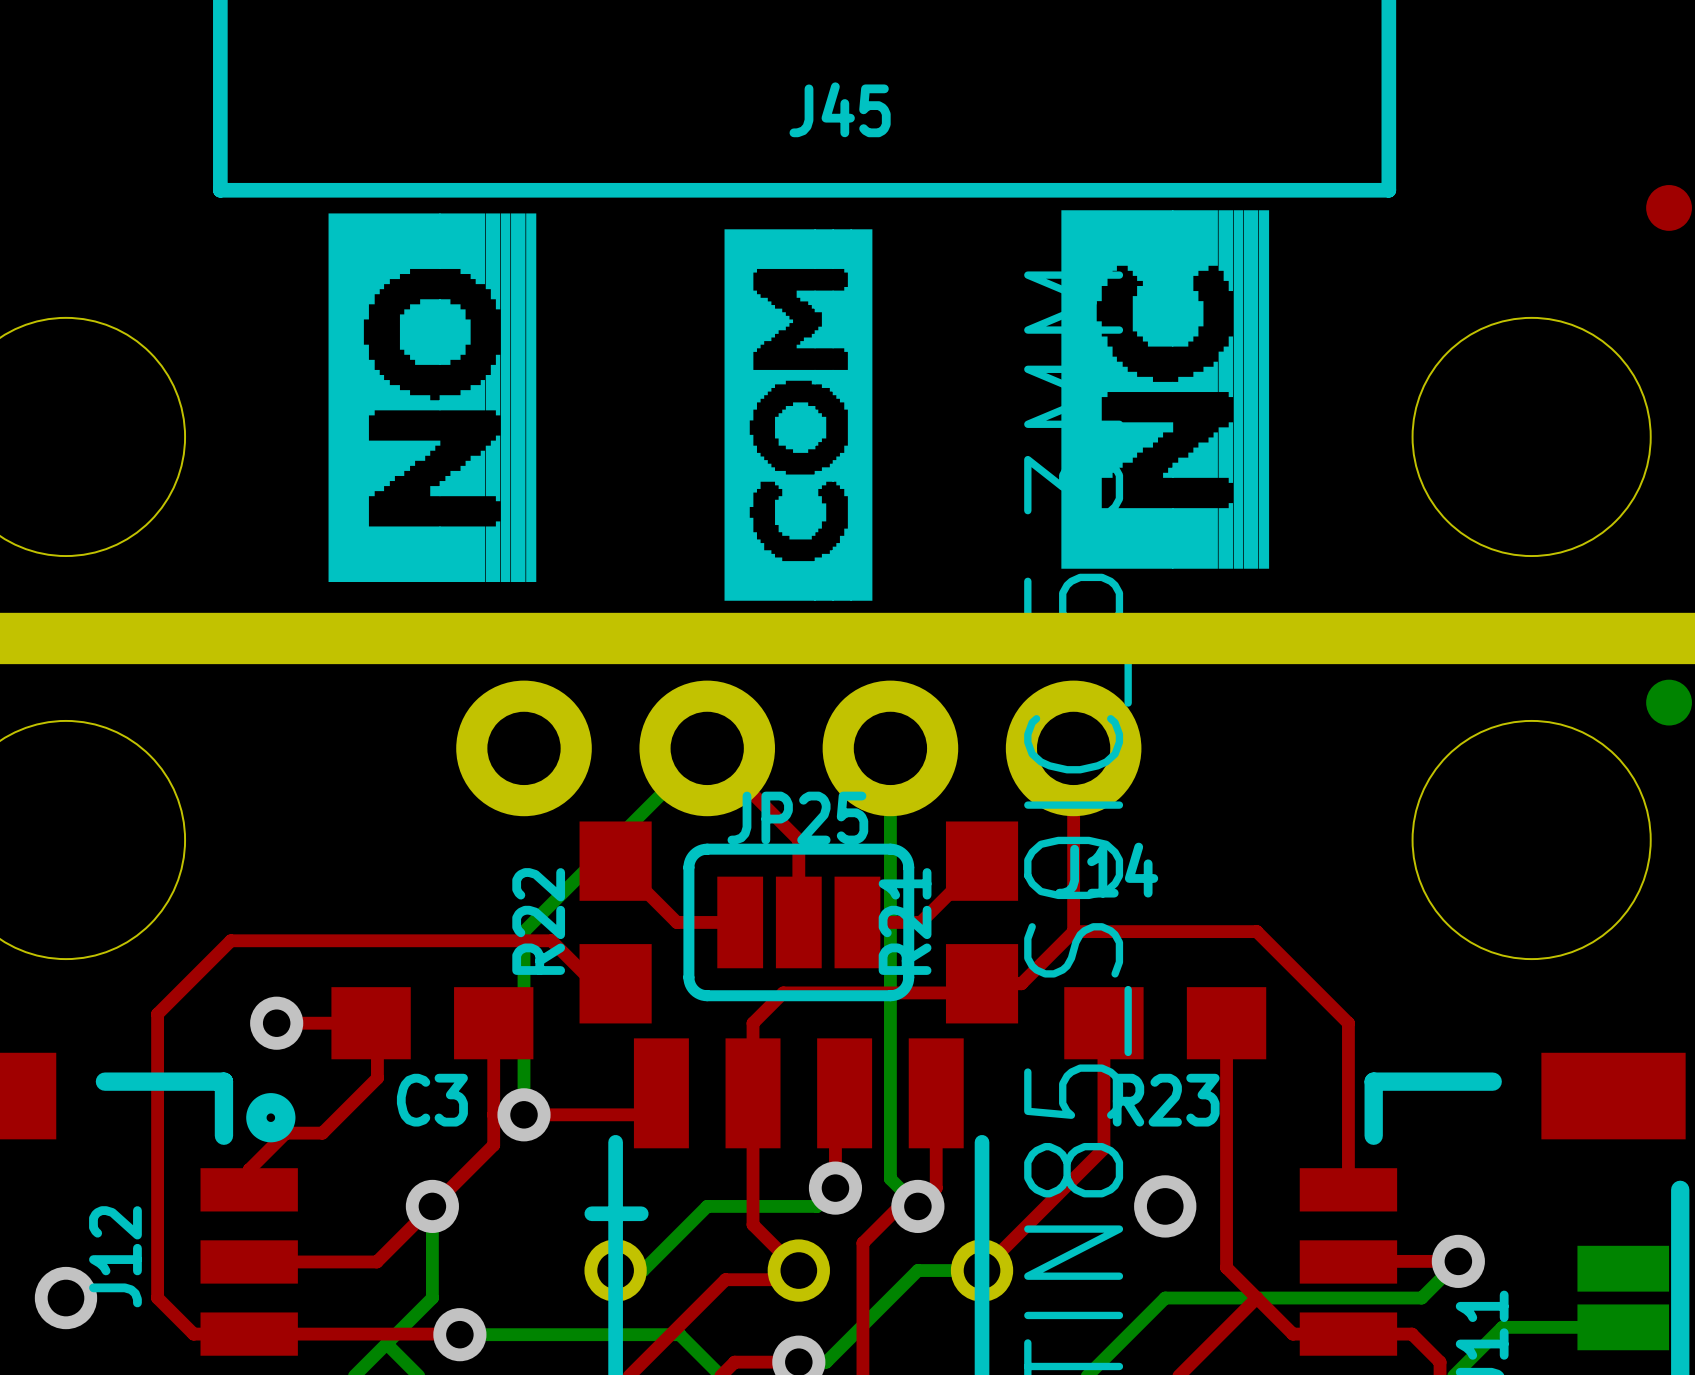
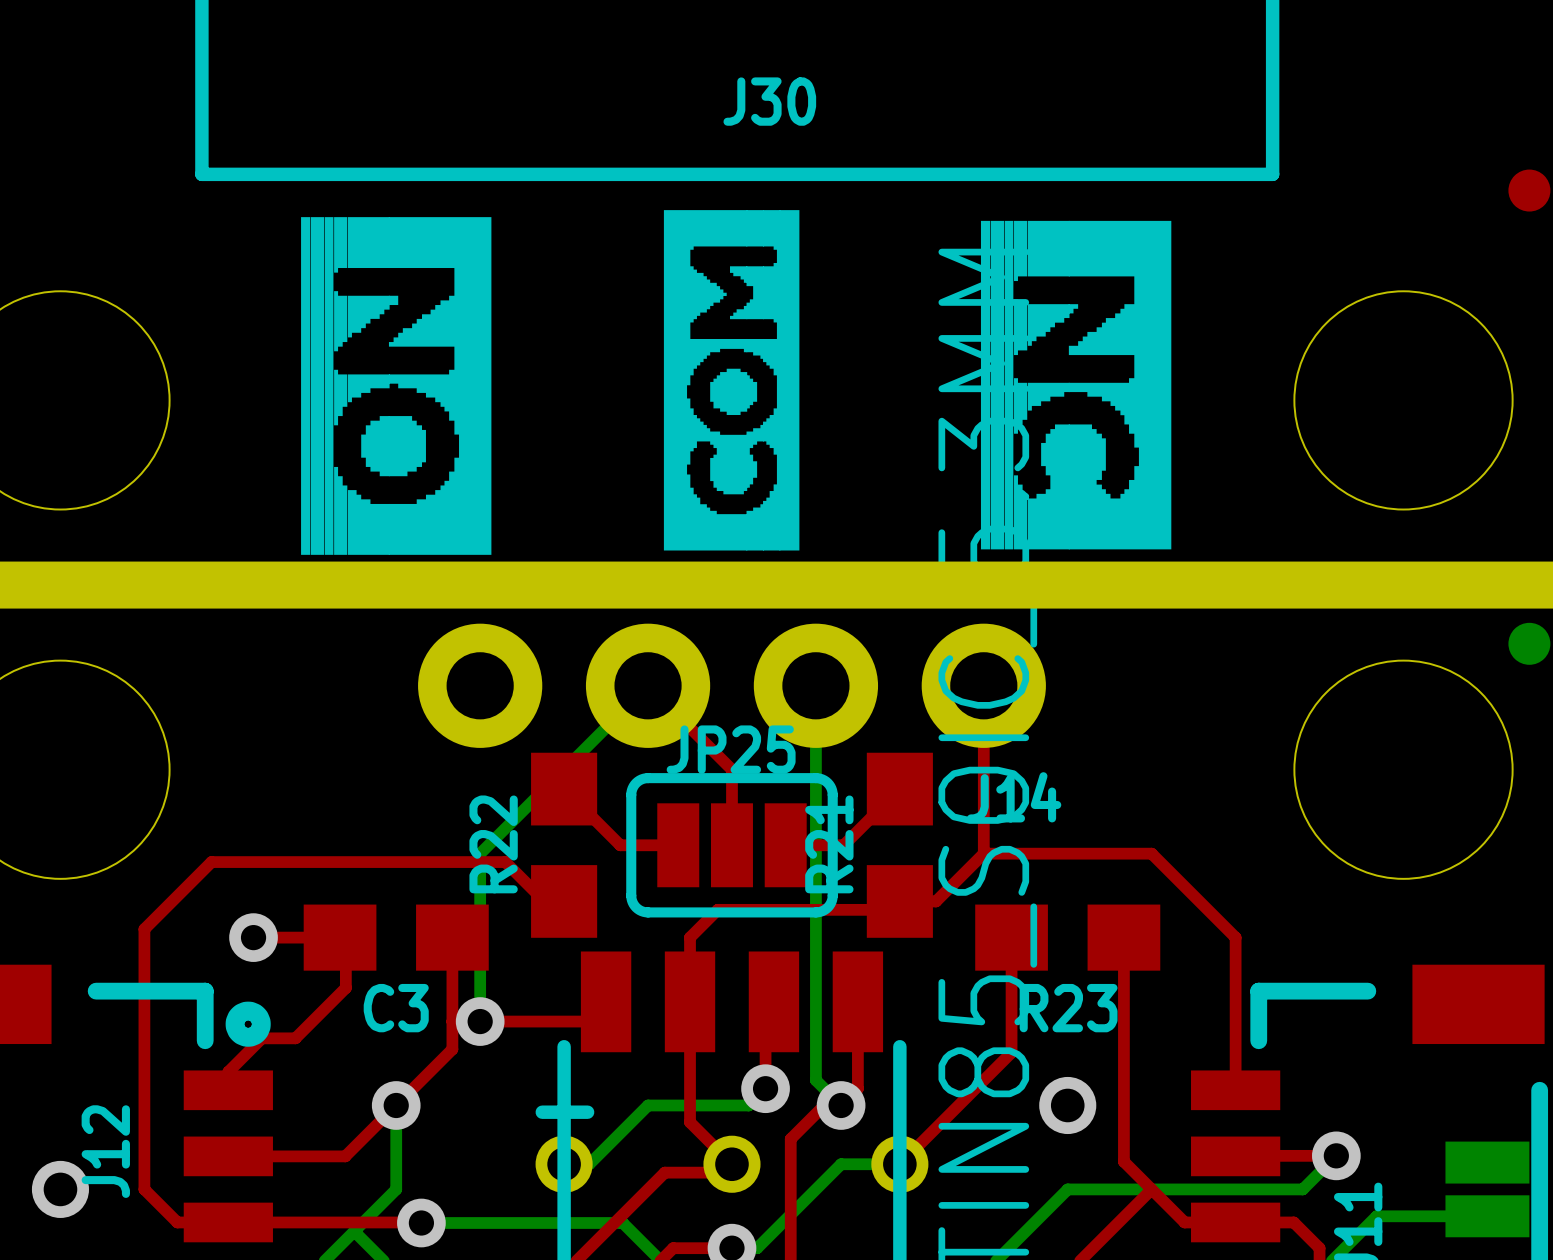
J45 name: J45 (840, 109) -> J30 (769, 101)
drawing shape: [1061, 210, 1270, 569] -> [980, 220, 1172, 550]
drawing shape: [328, 213, 537, 583] -> [301, 217, 492, 555]

